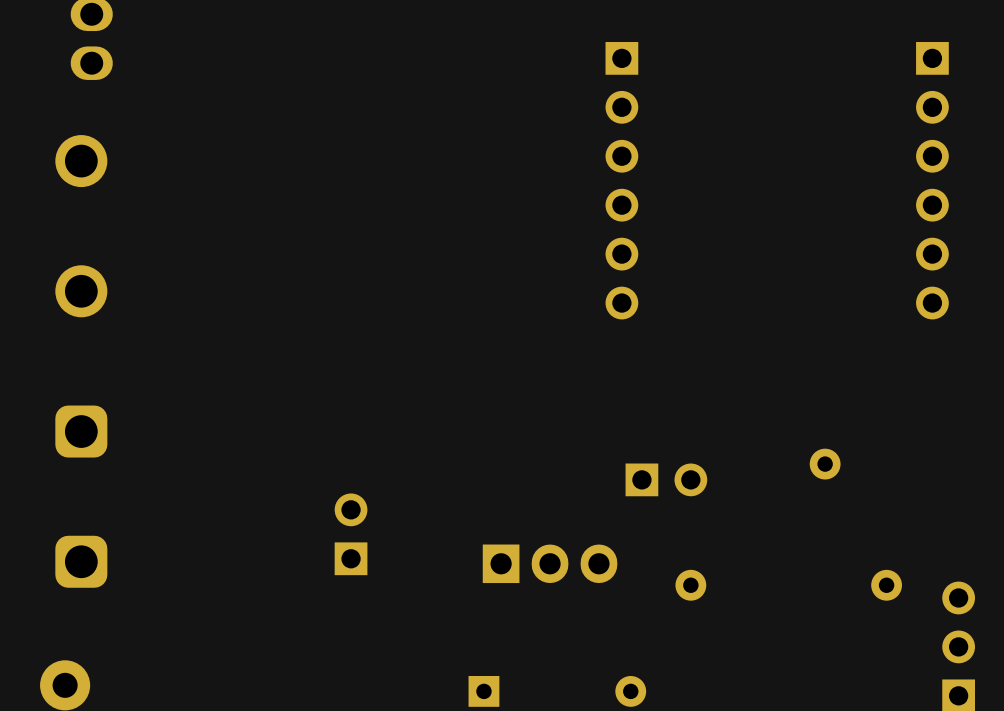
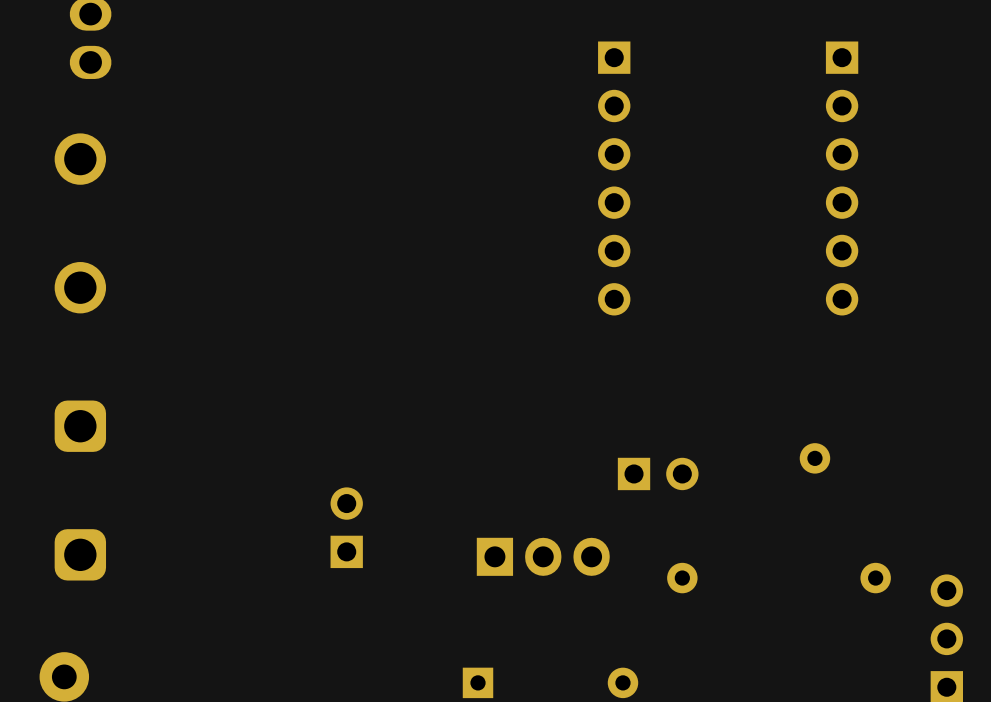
part position: (932, 180) -> (842, 178)

